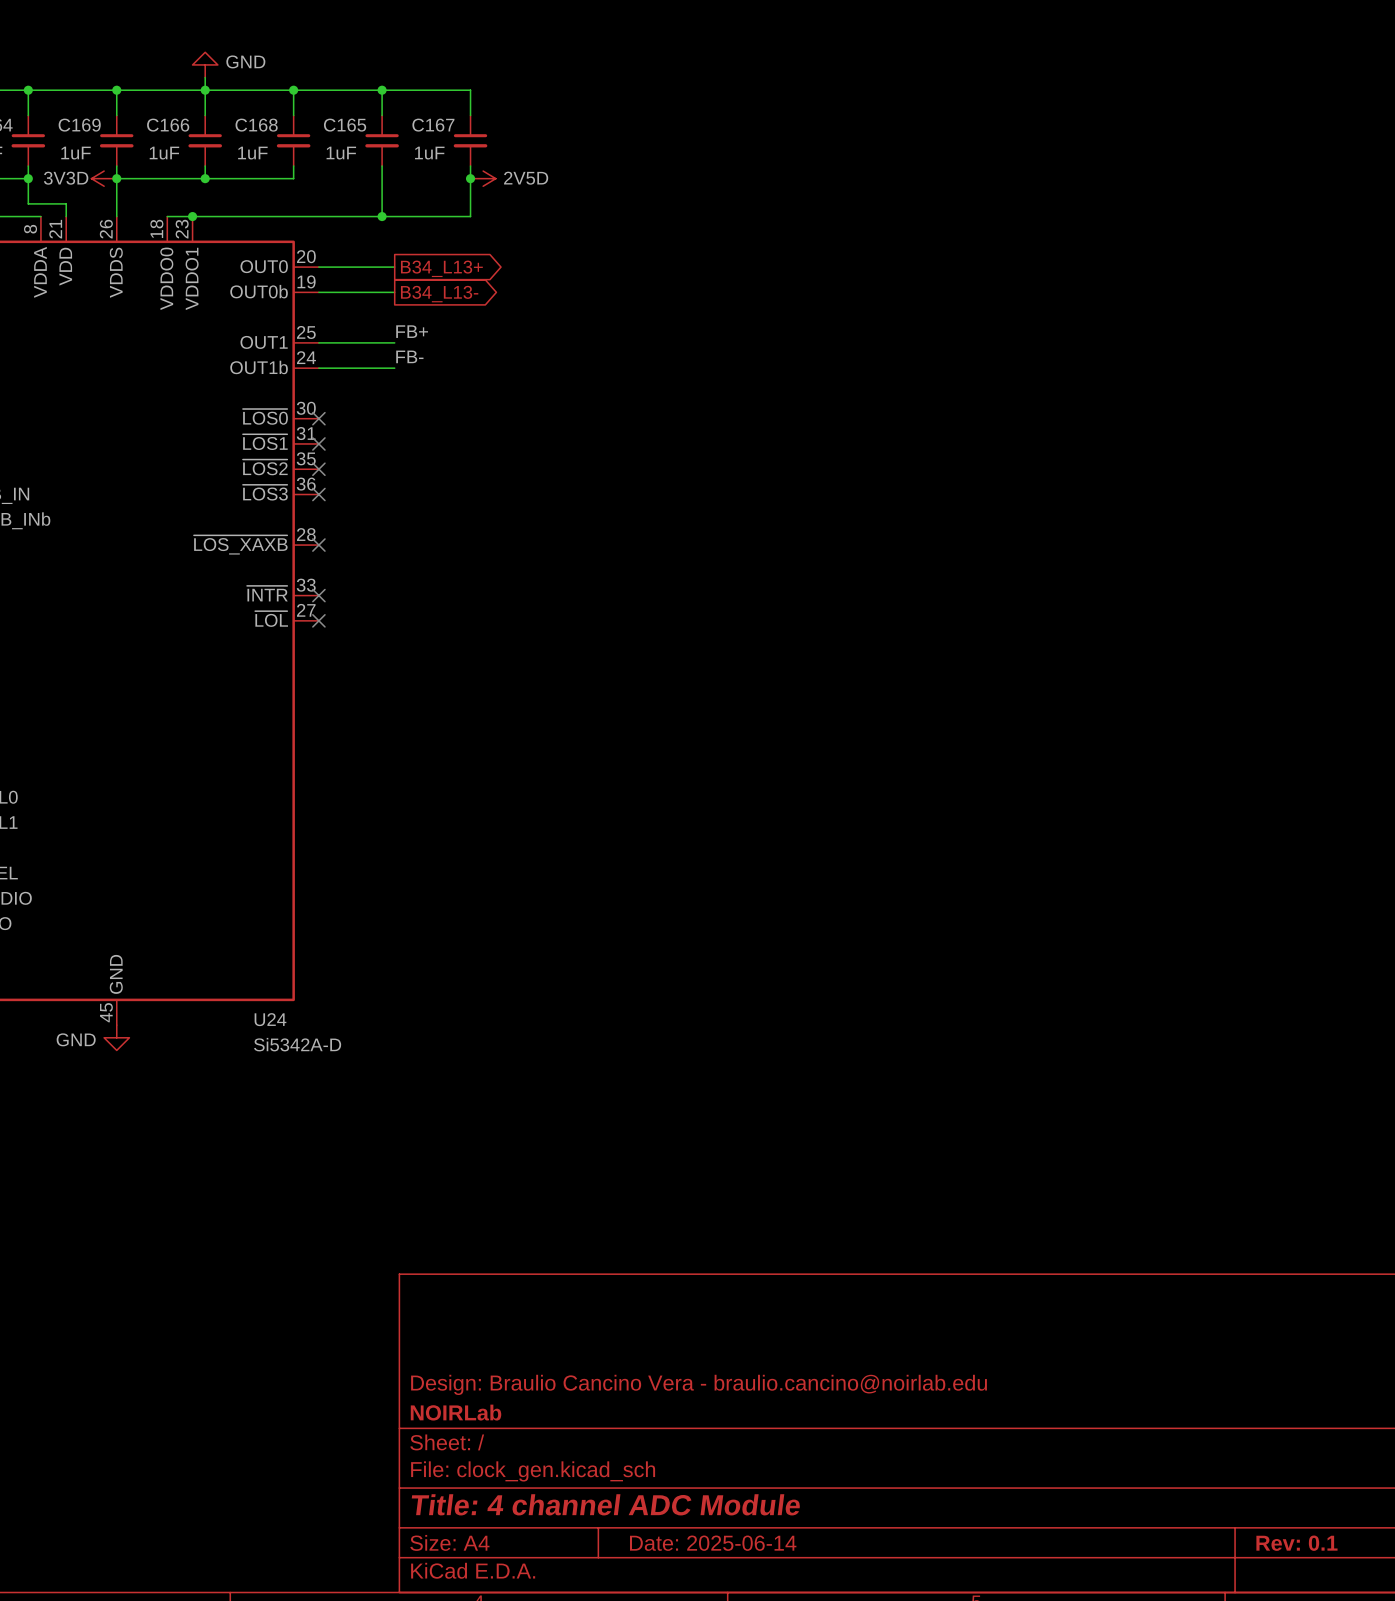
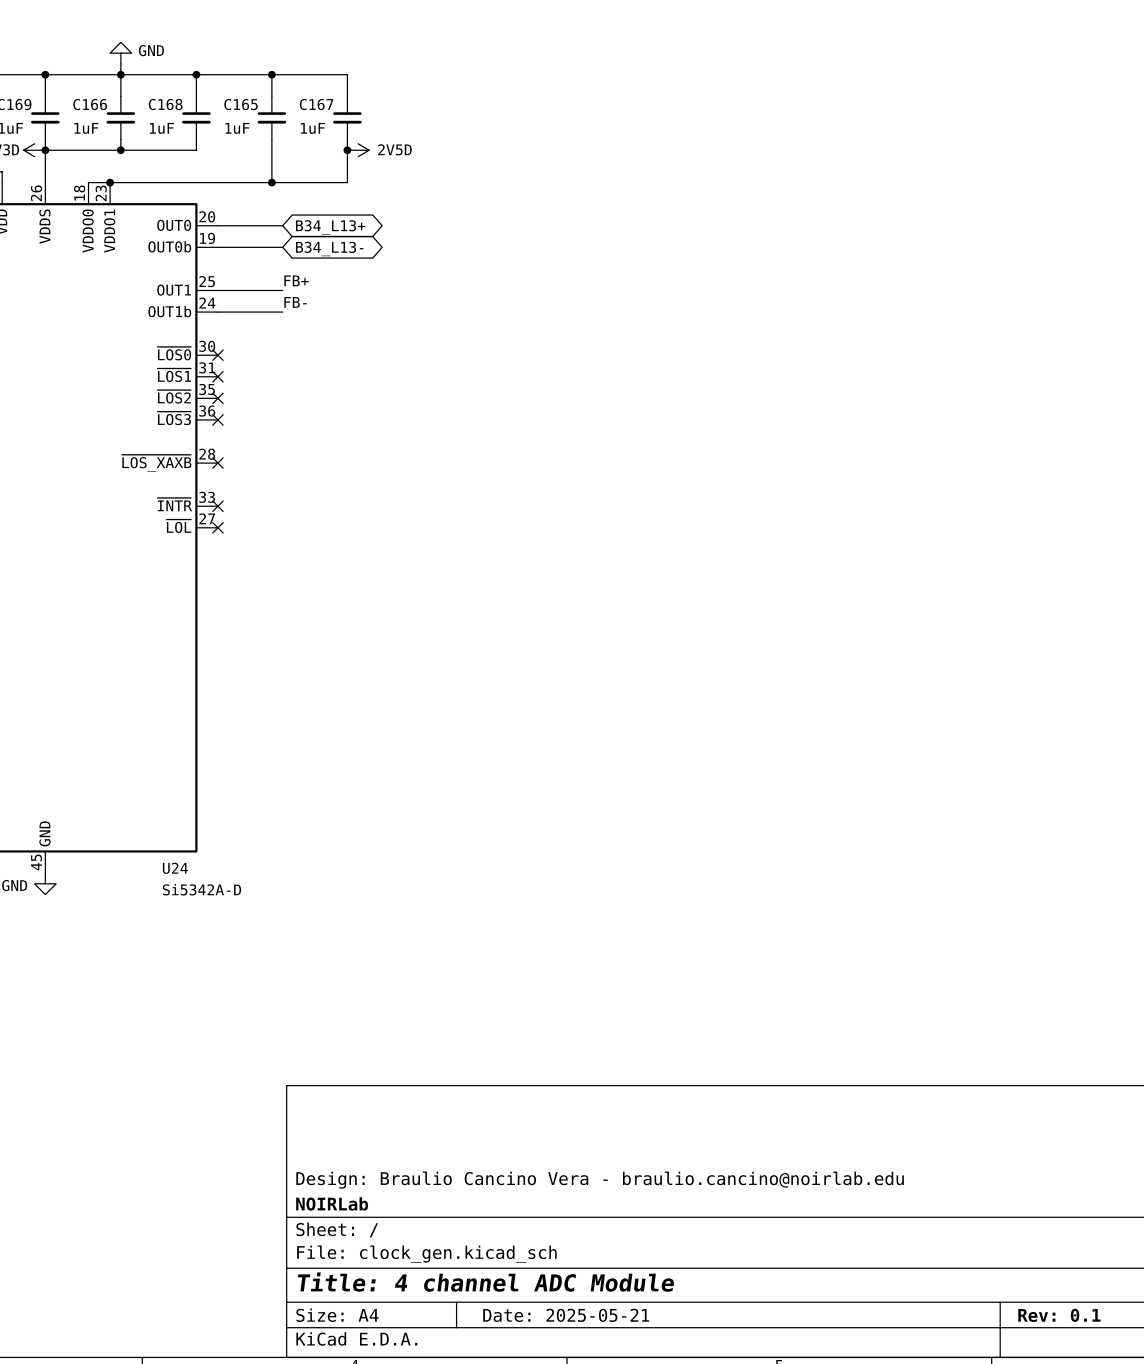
global label shape: output (441, 268) -> bidirectional (330, 227)
global label shape: output (439, 294) -> bidirectional (329, 248)
title block: Date: 2025-06-14 (713, 1543) -> Date: 2025-05-21 (566, 1315)

